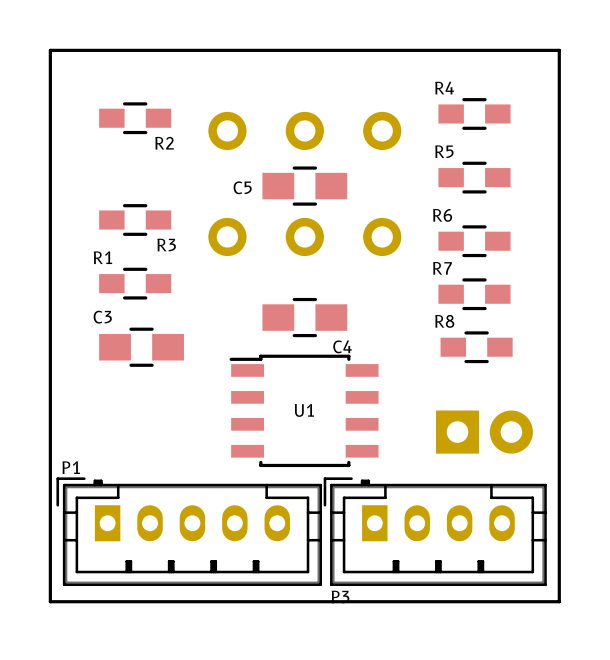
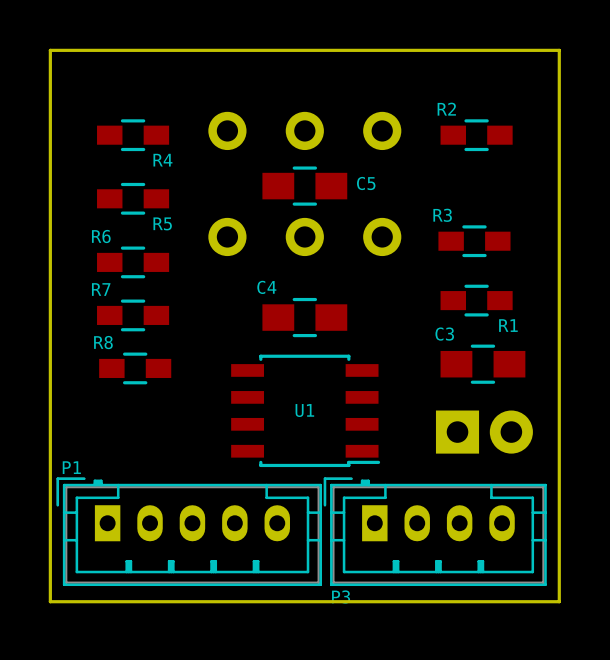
R4 name position: R4 (444, 88) -> R4 (162, 160)
R4 position: (474, 113) -> (133, 135)
R2 position: (135, 118) -> (476, 135)
R2 name position: R2 (164, 143) -> R2 (446, 109)
R5 name position: R5 (444, 151) -> R5 (162, 223)
R5 position: (474, 177) -> (133, 198)
C5 name position: C5 (242, 187) -> C5 (366, 183)
R6 name: R6 (442, 215) -> R3 (442, 215)
R3: (135, 220) -> none
R1 name position: R1 (102, 257) -> R1 (508, 325)
R6: none -> (133, 262)
R1 position: (135, 283) -> (476, 300)
R7 position: (474, 294) -> (133, 315)
C4 name position: C4 (342, 346) -> C4 (266, 287)
C3 position: (141, 347) -> (482, 364)
R8 position: (476, 347) -> (135, 368)
U1 rotation: 0° (304, 410) -> 180° (305, 410)

